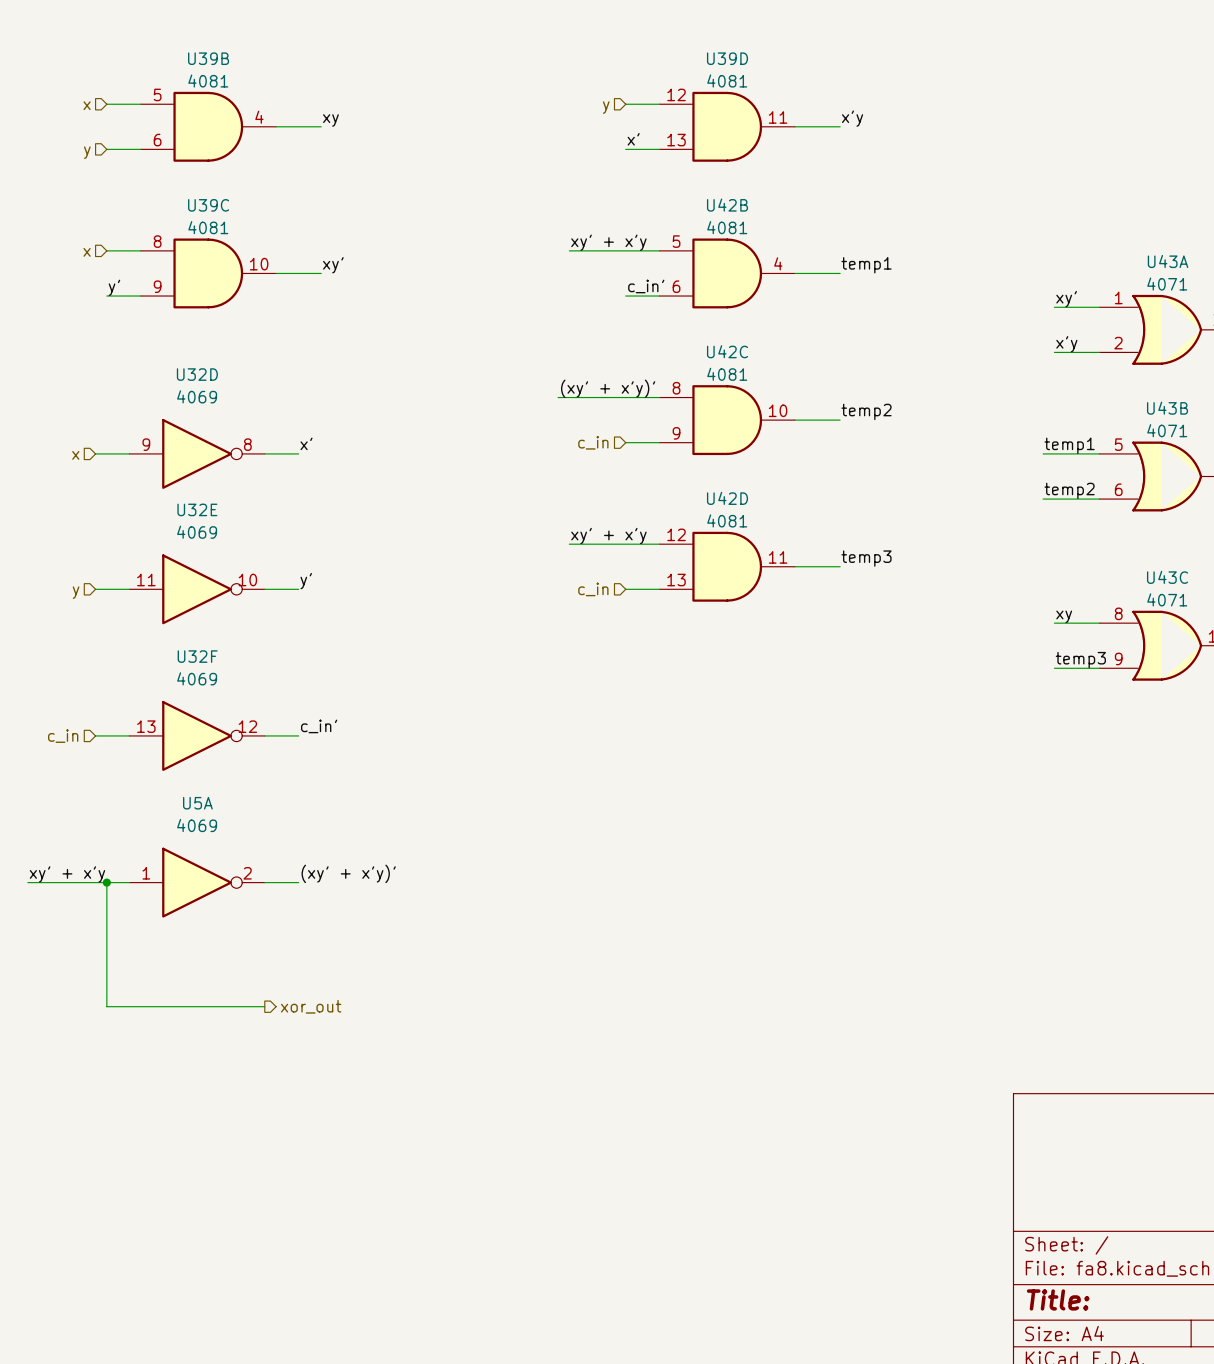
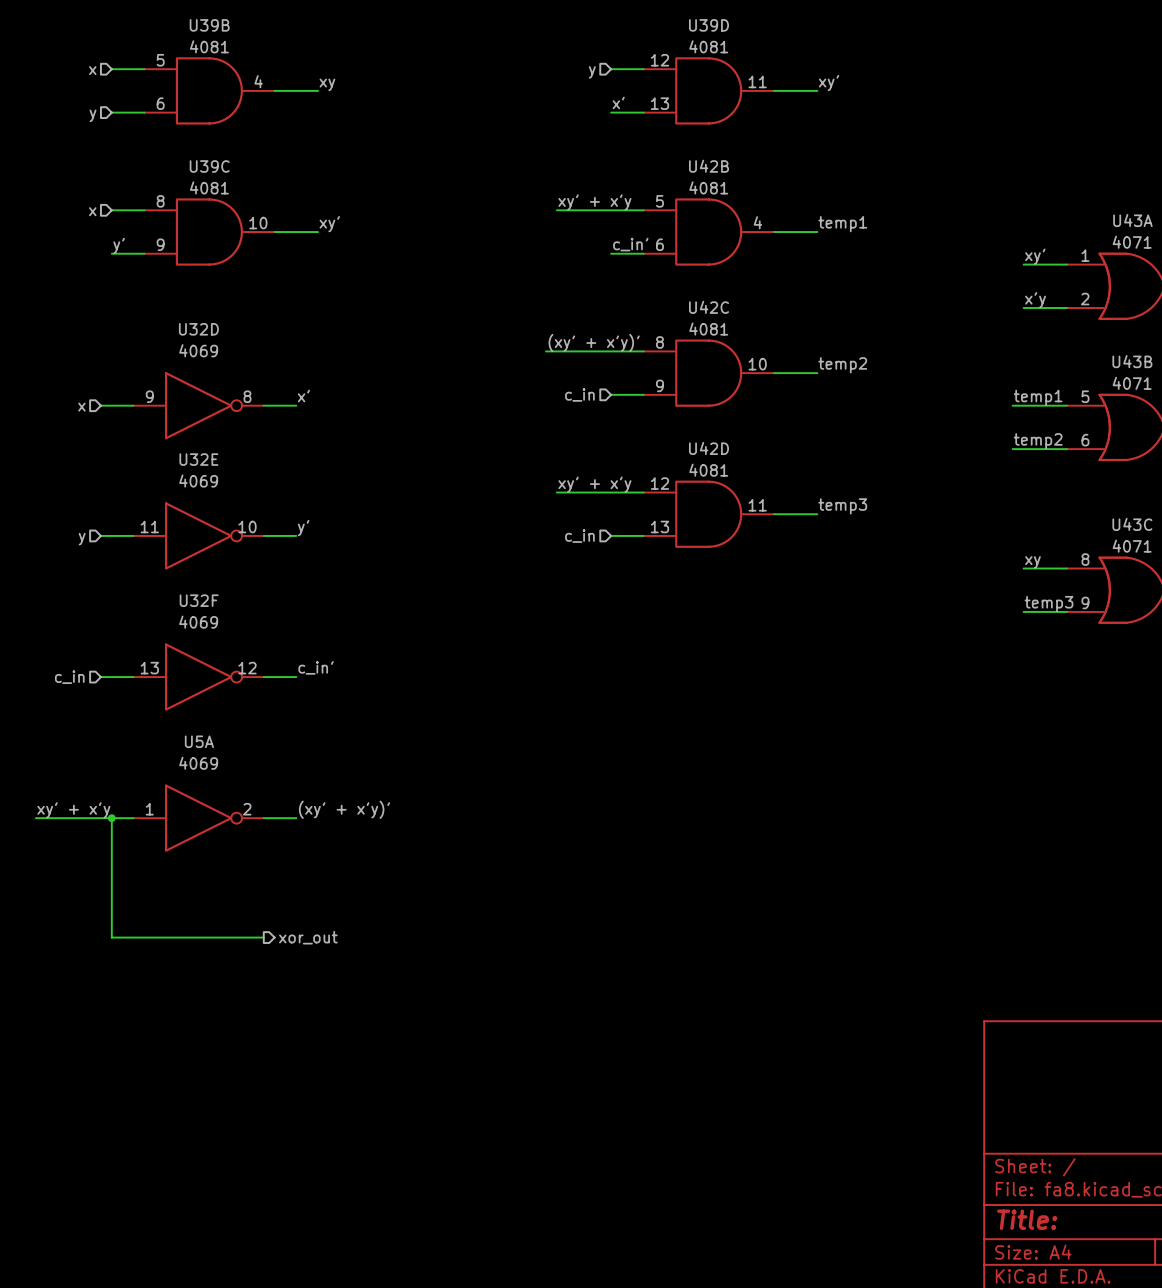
label: x'y (852, 118) -> xy' (829, 83)

